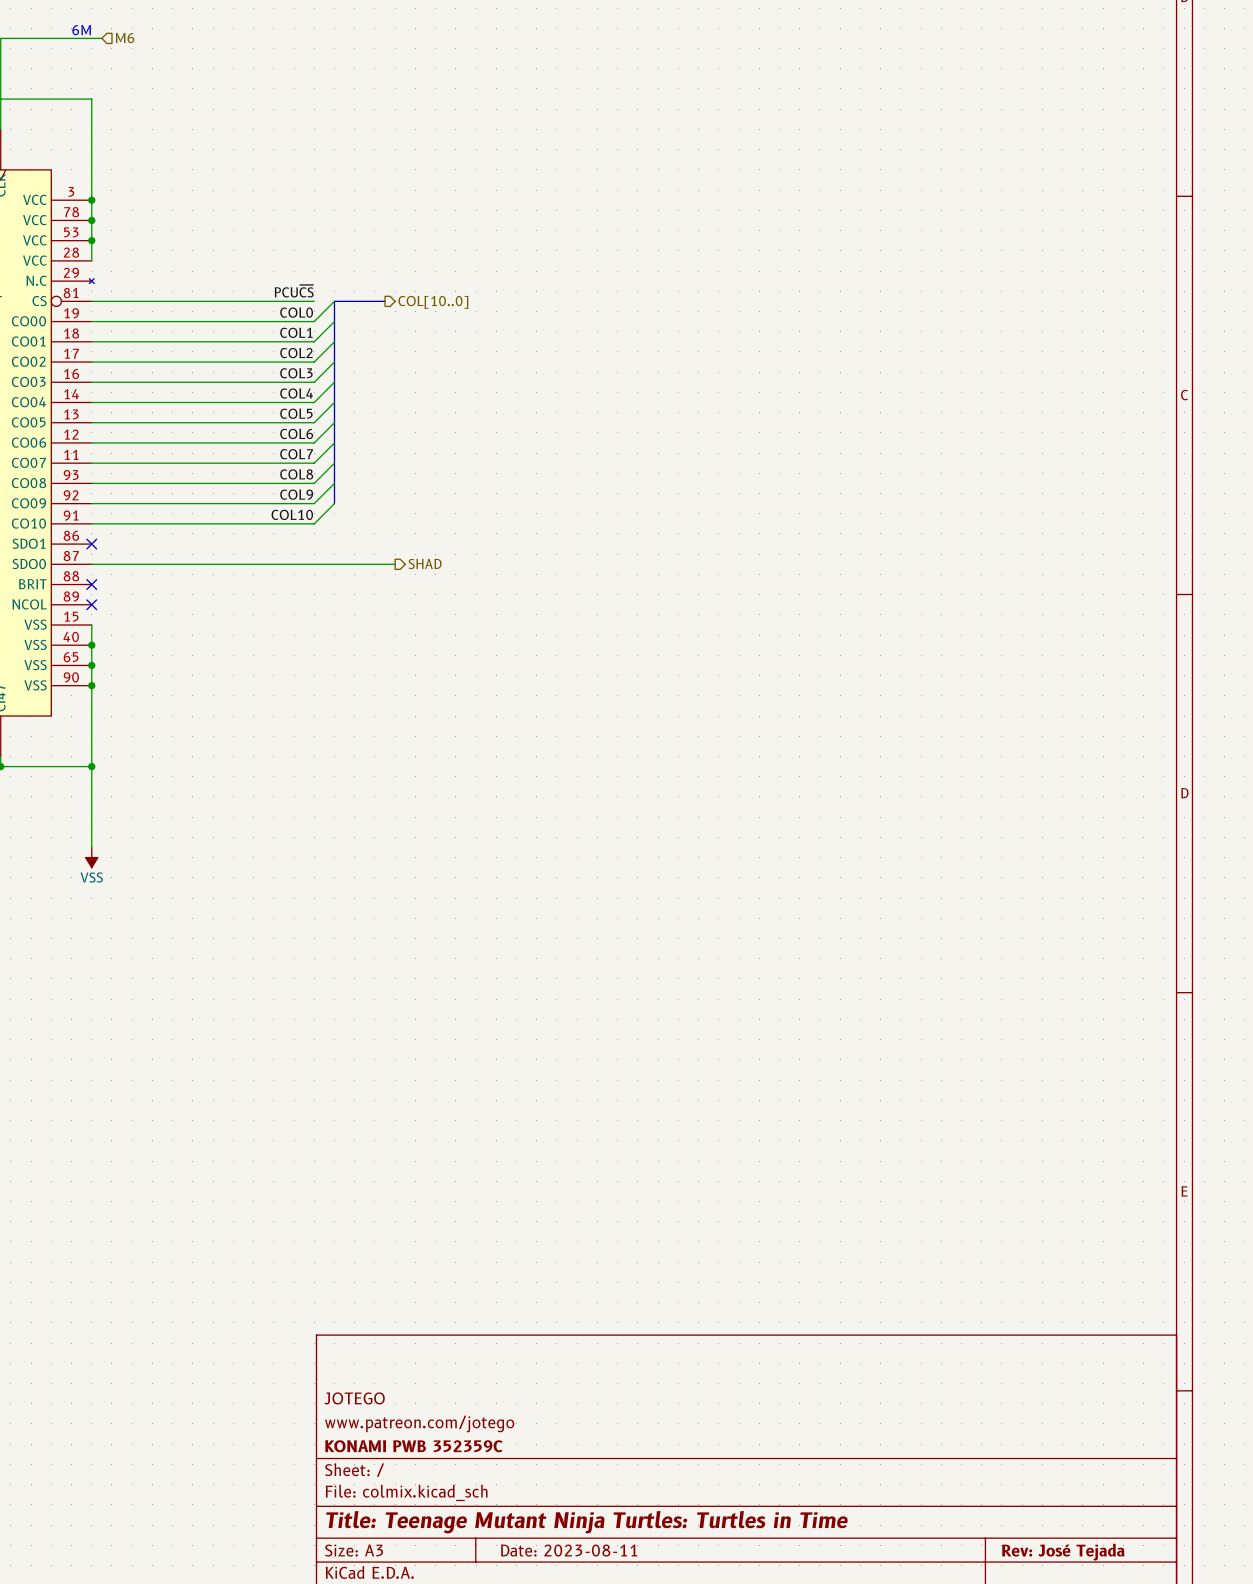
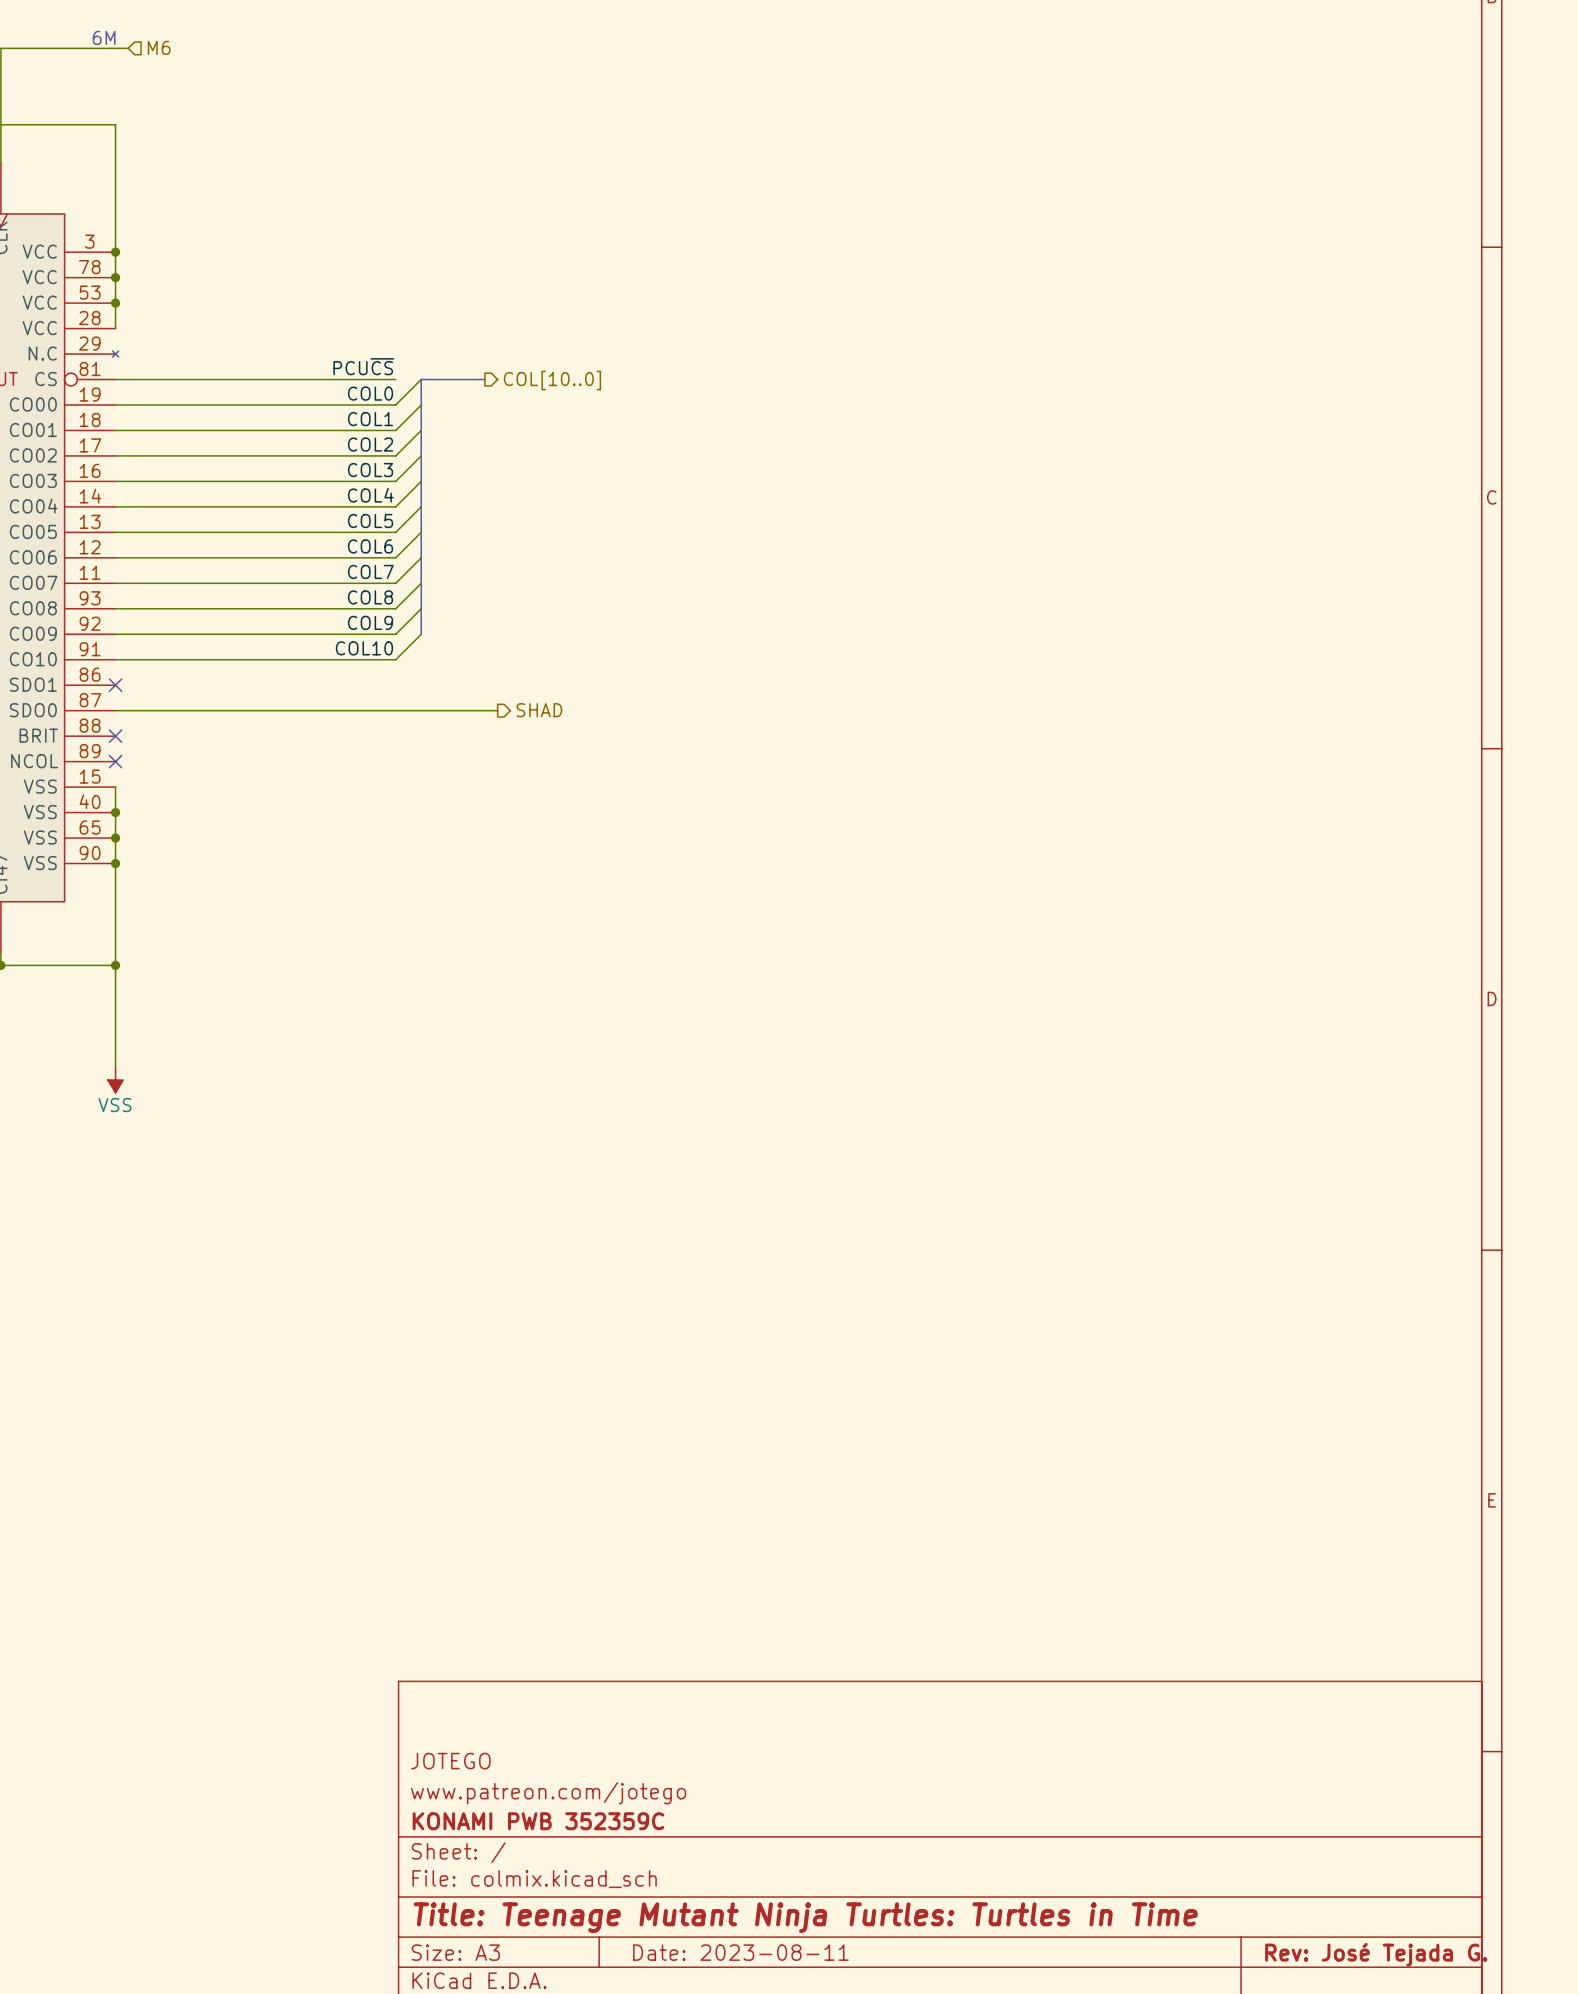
title block: Rev: José Tejada (1063, 1552) -> Rev: José Tejada G. (1376, 1954)

